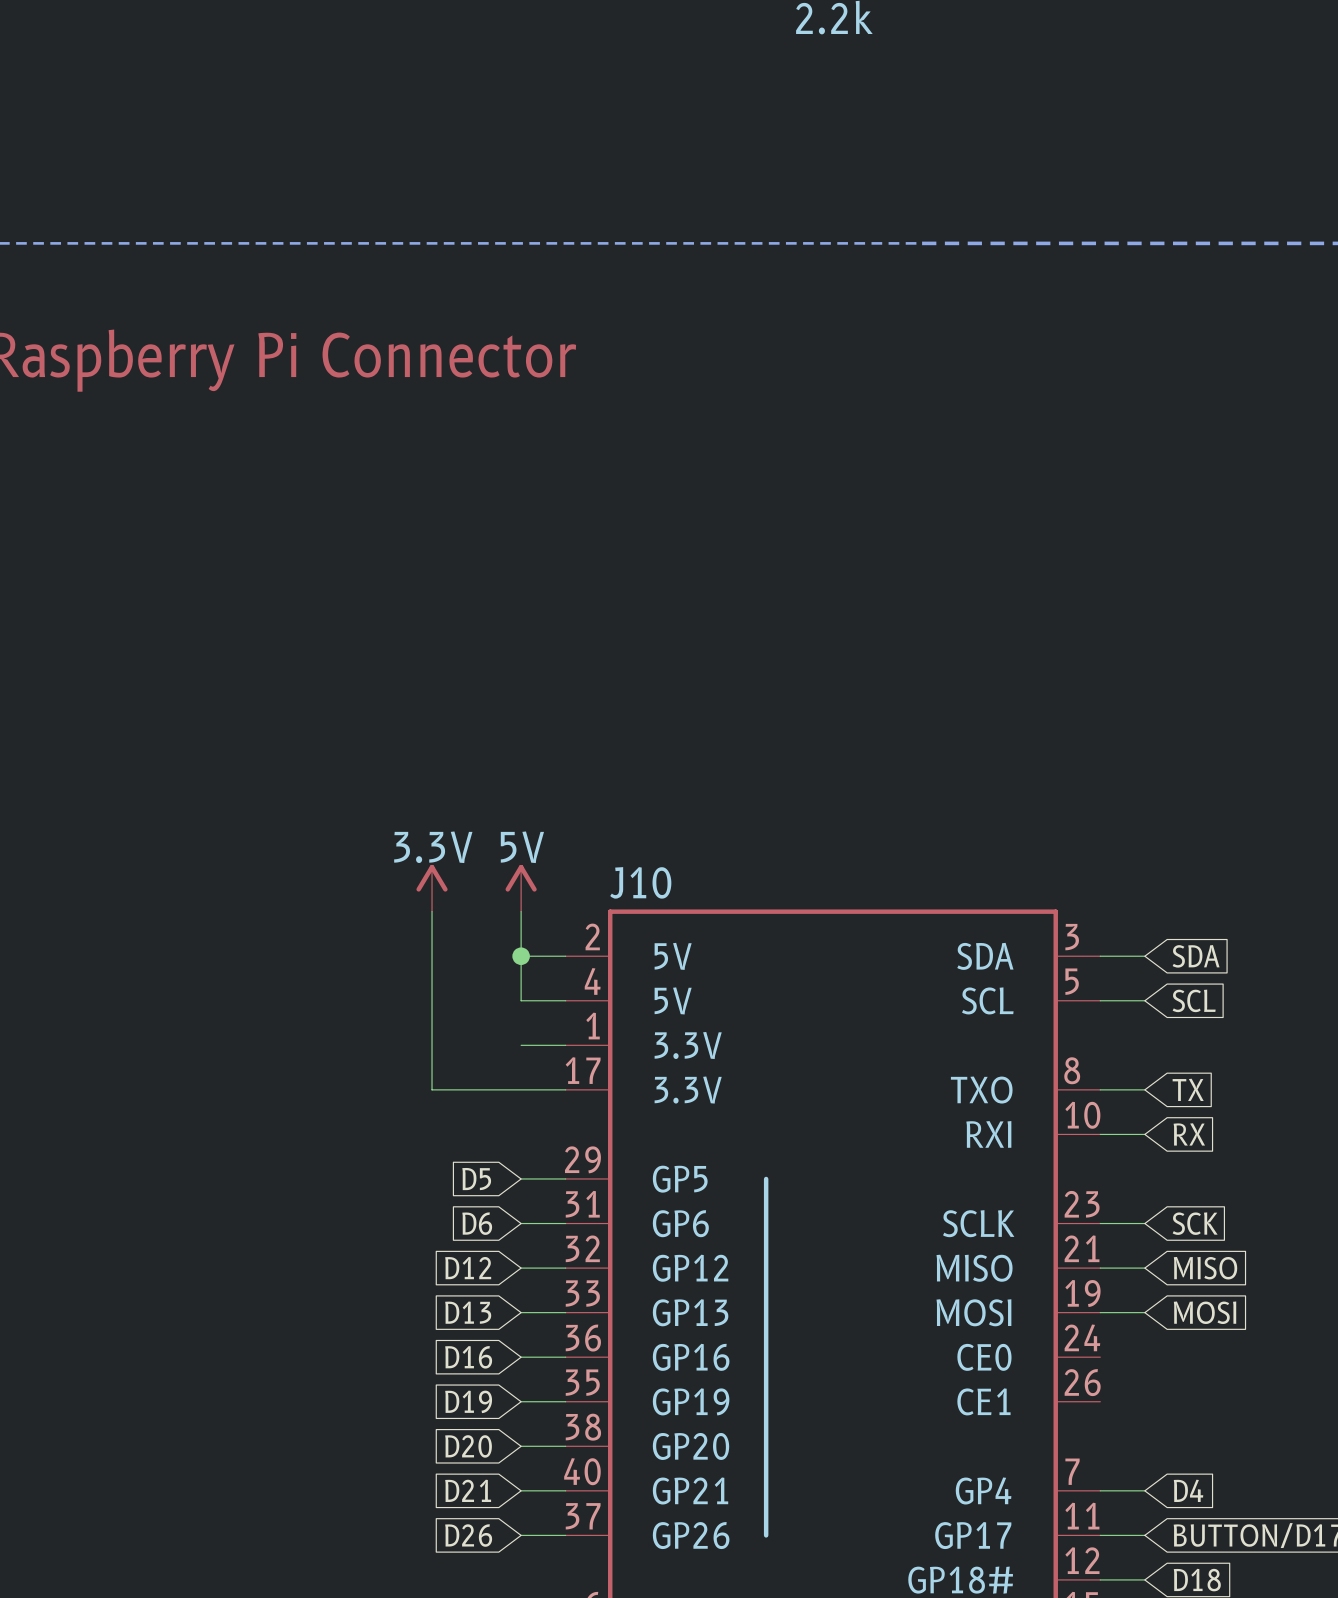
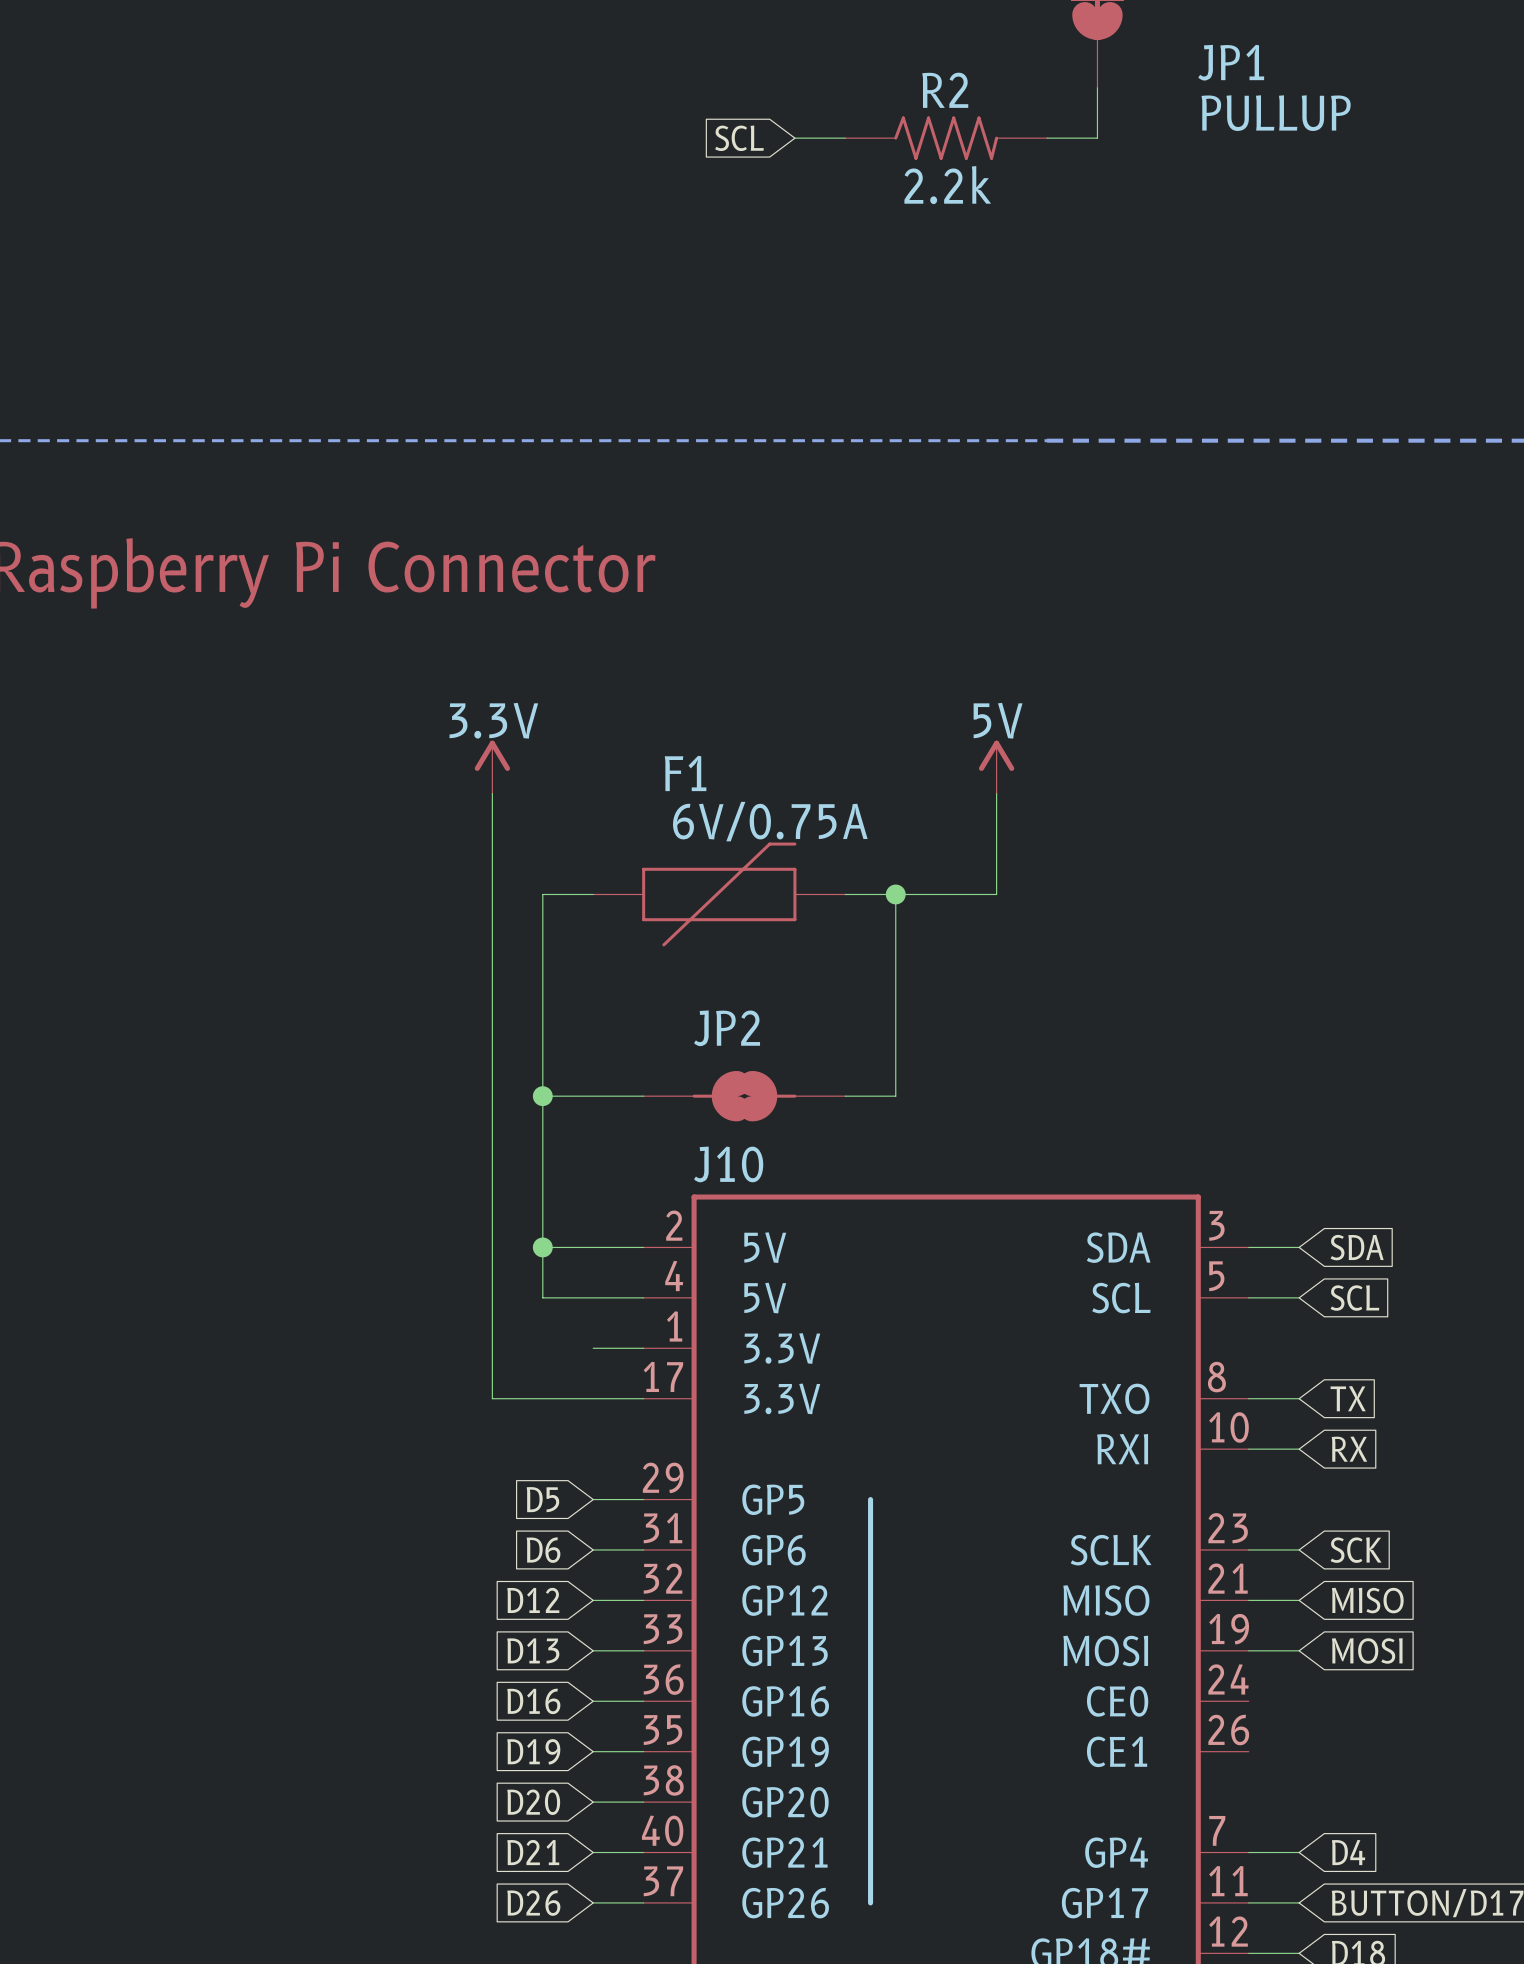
power symbol: none -> 5V (996, 767)
wire: none -> (492, 793) (492, 1197)
wire: none -> (996, 793) (996, 894) (845, 894)
F1: none -> 6V/0.75A (719, 894)
wire: none -> (895, 894) (895, 1096) (845, 1096)
junction: none -> (895, 894)
wire: none -> (542, 1096) (643, 1096)
junction: none -> (542, 1096)
JP2: none -> (744, 1096)
power symbol position: 3.3V (432, 888) -> 3.3V (492, 767)
power symbol: 5V (521, 888) -> none
wire: (521, 911) (521, 1000) -> (593, 894) (542, 894) (542, 1297) (593, 1297)
wire: none -> (542, 1247) (593, 1247)
junction position: (521, 956) -> (542, 1247)

